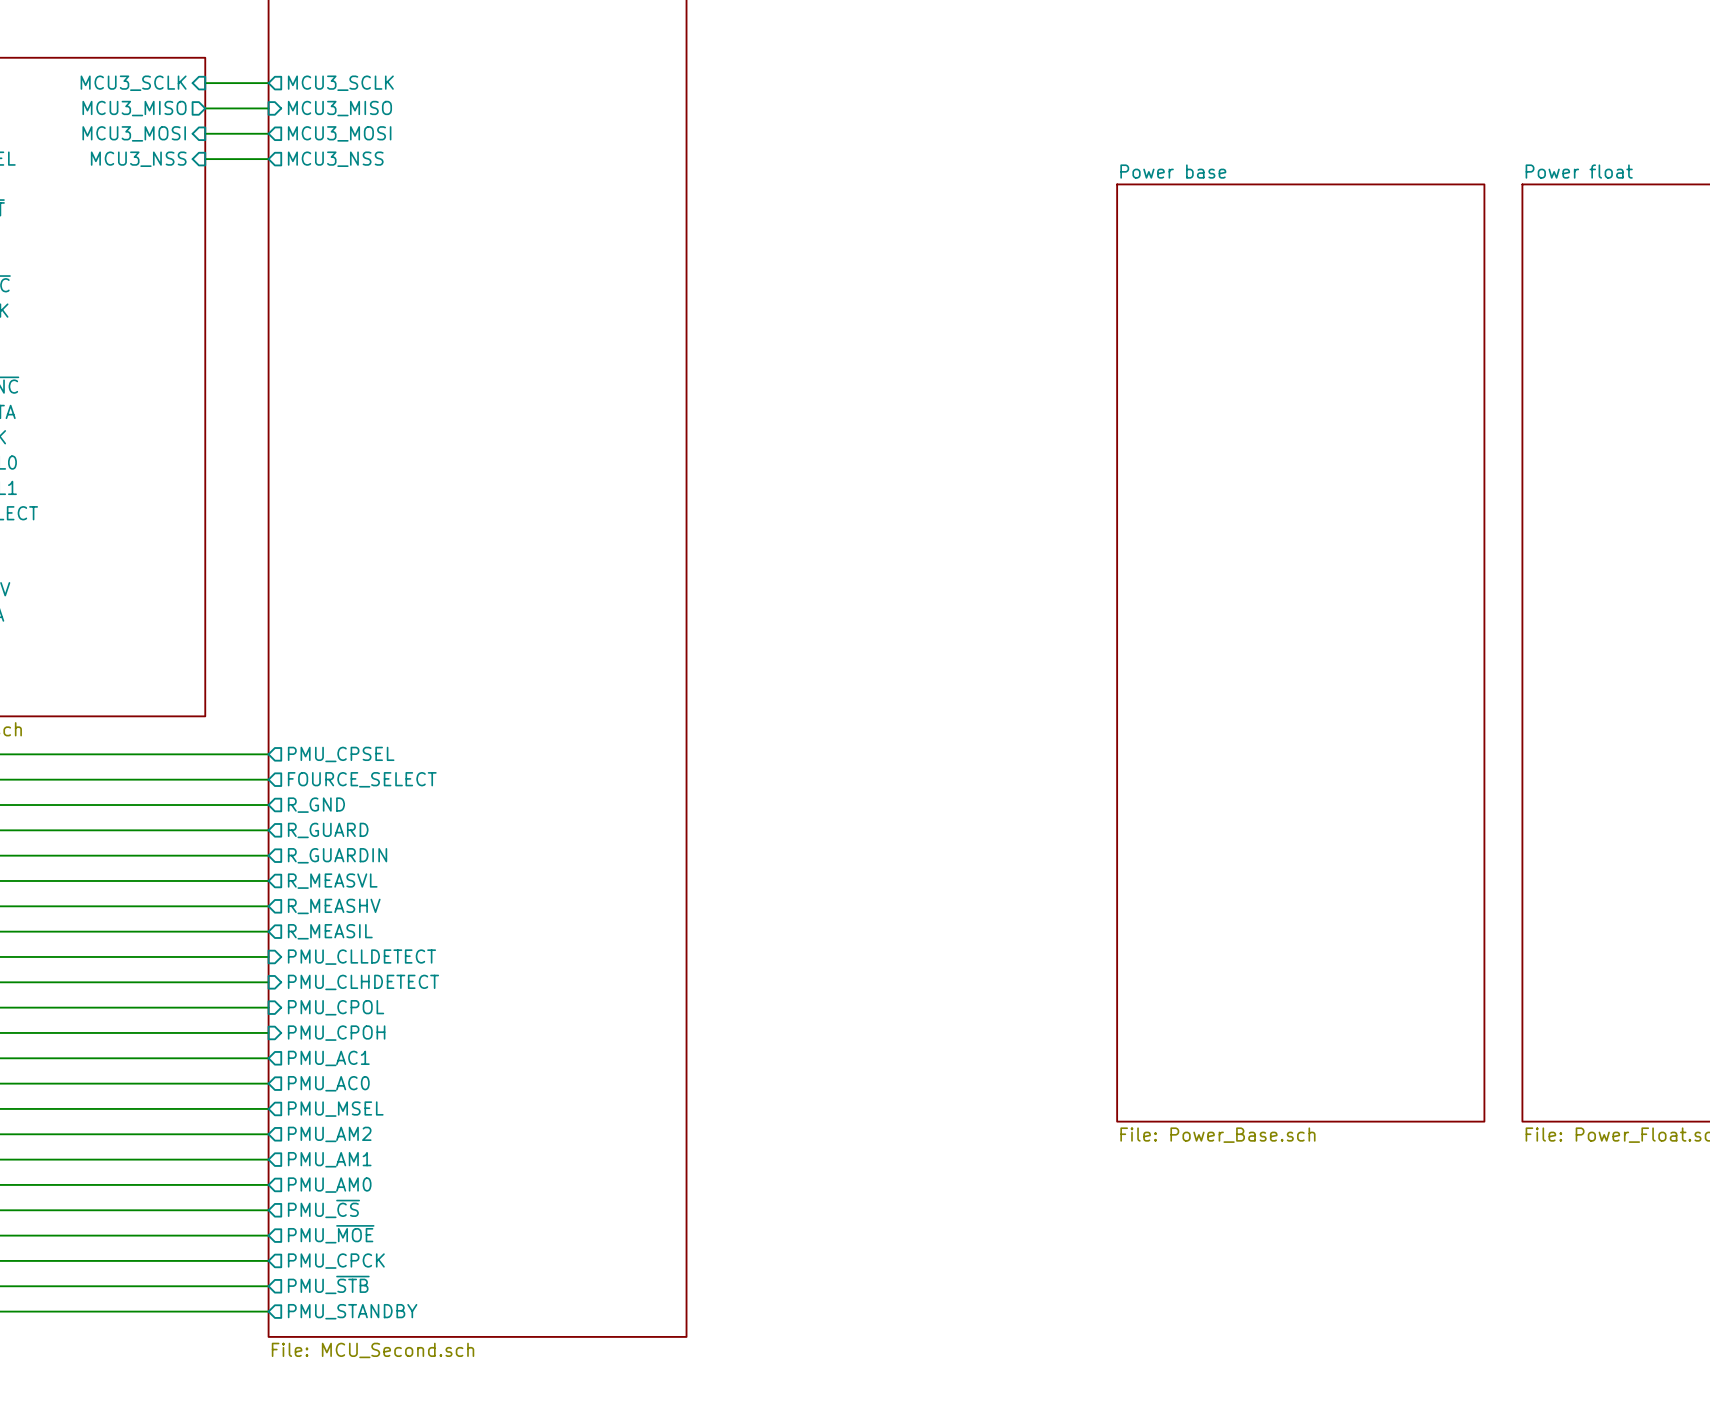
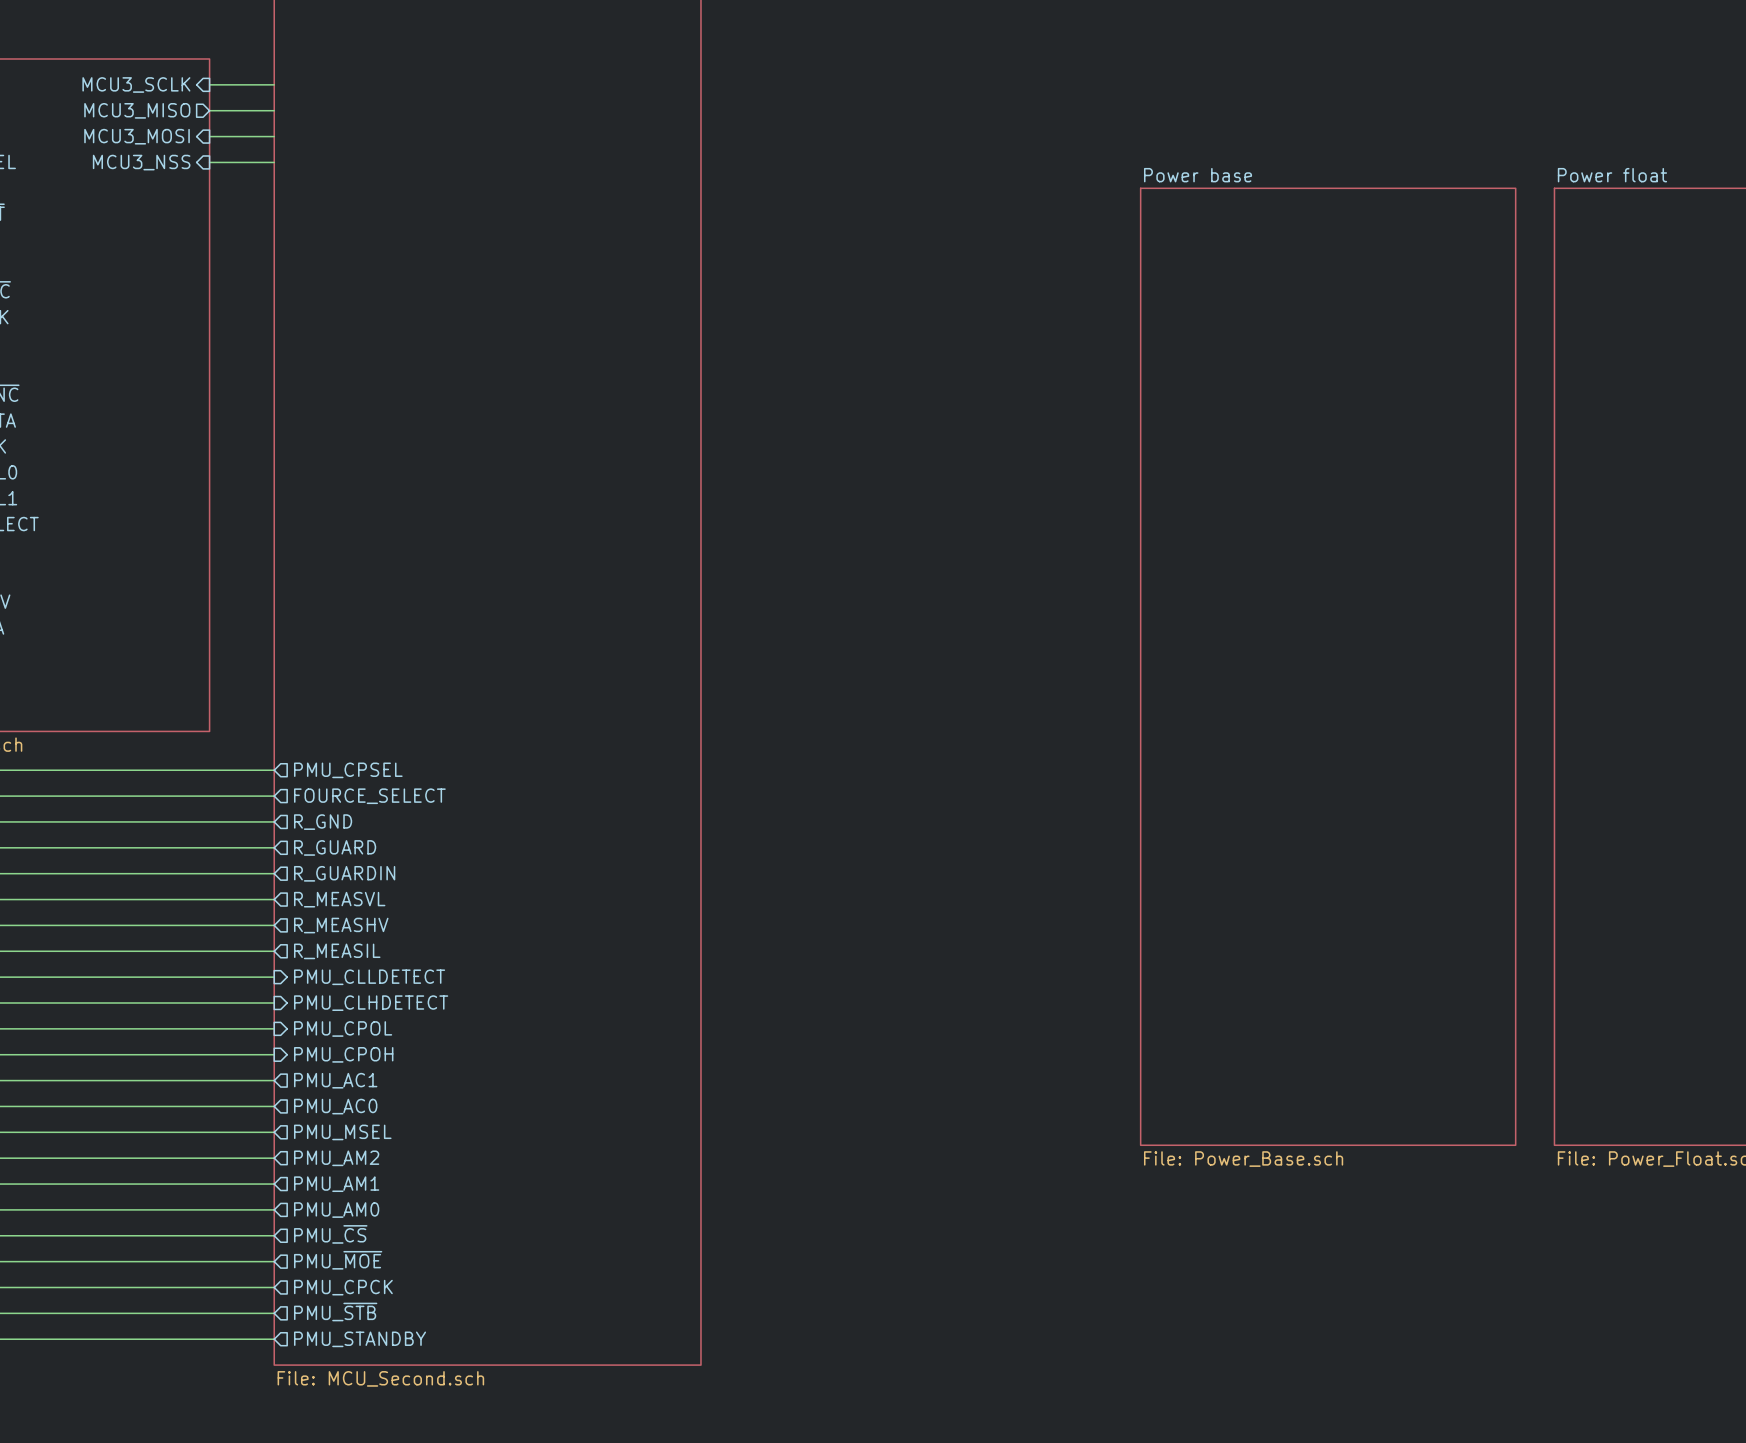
sheet pin: MCU3_SCLK (340, 83) -> none
sheet pin: MCU3_MISO (339, 108) -> none
sheet pin: MCU3_MOSI (339, 133) -> none
sheet pin: MCU3_NSS (335, 159) -> none

